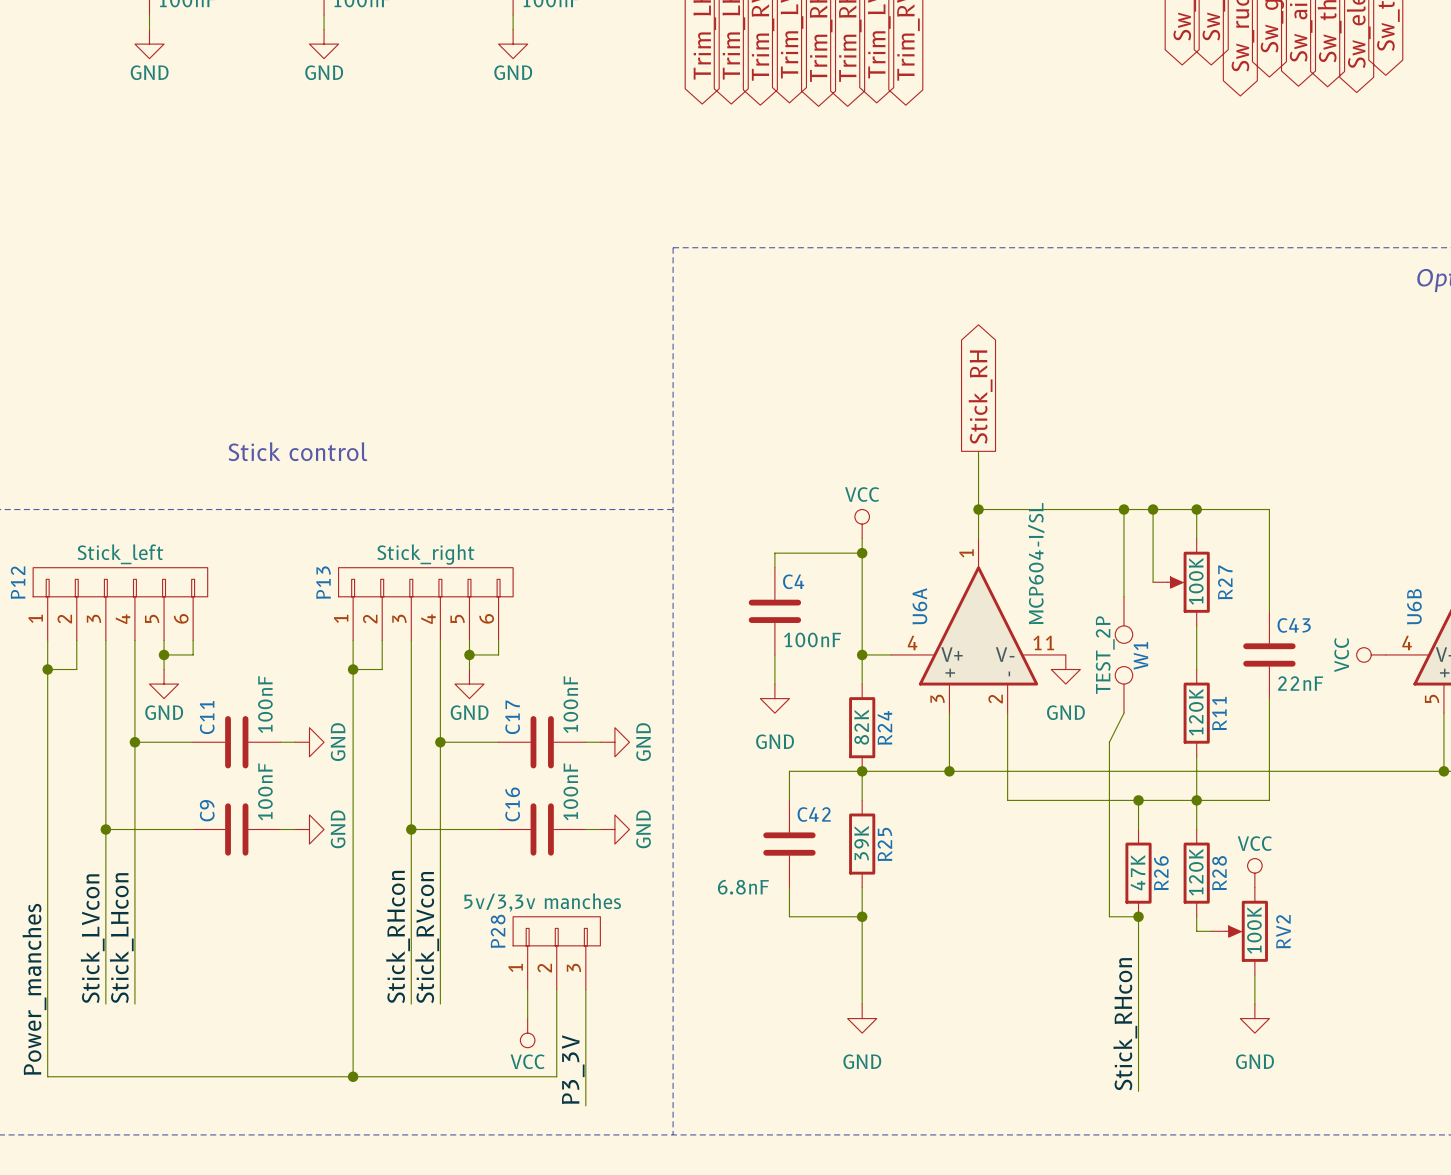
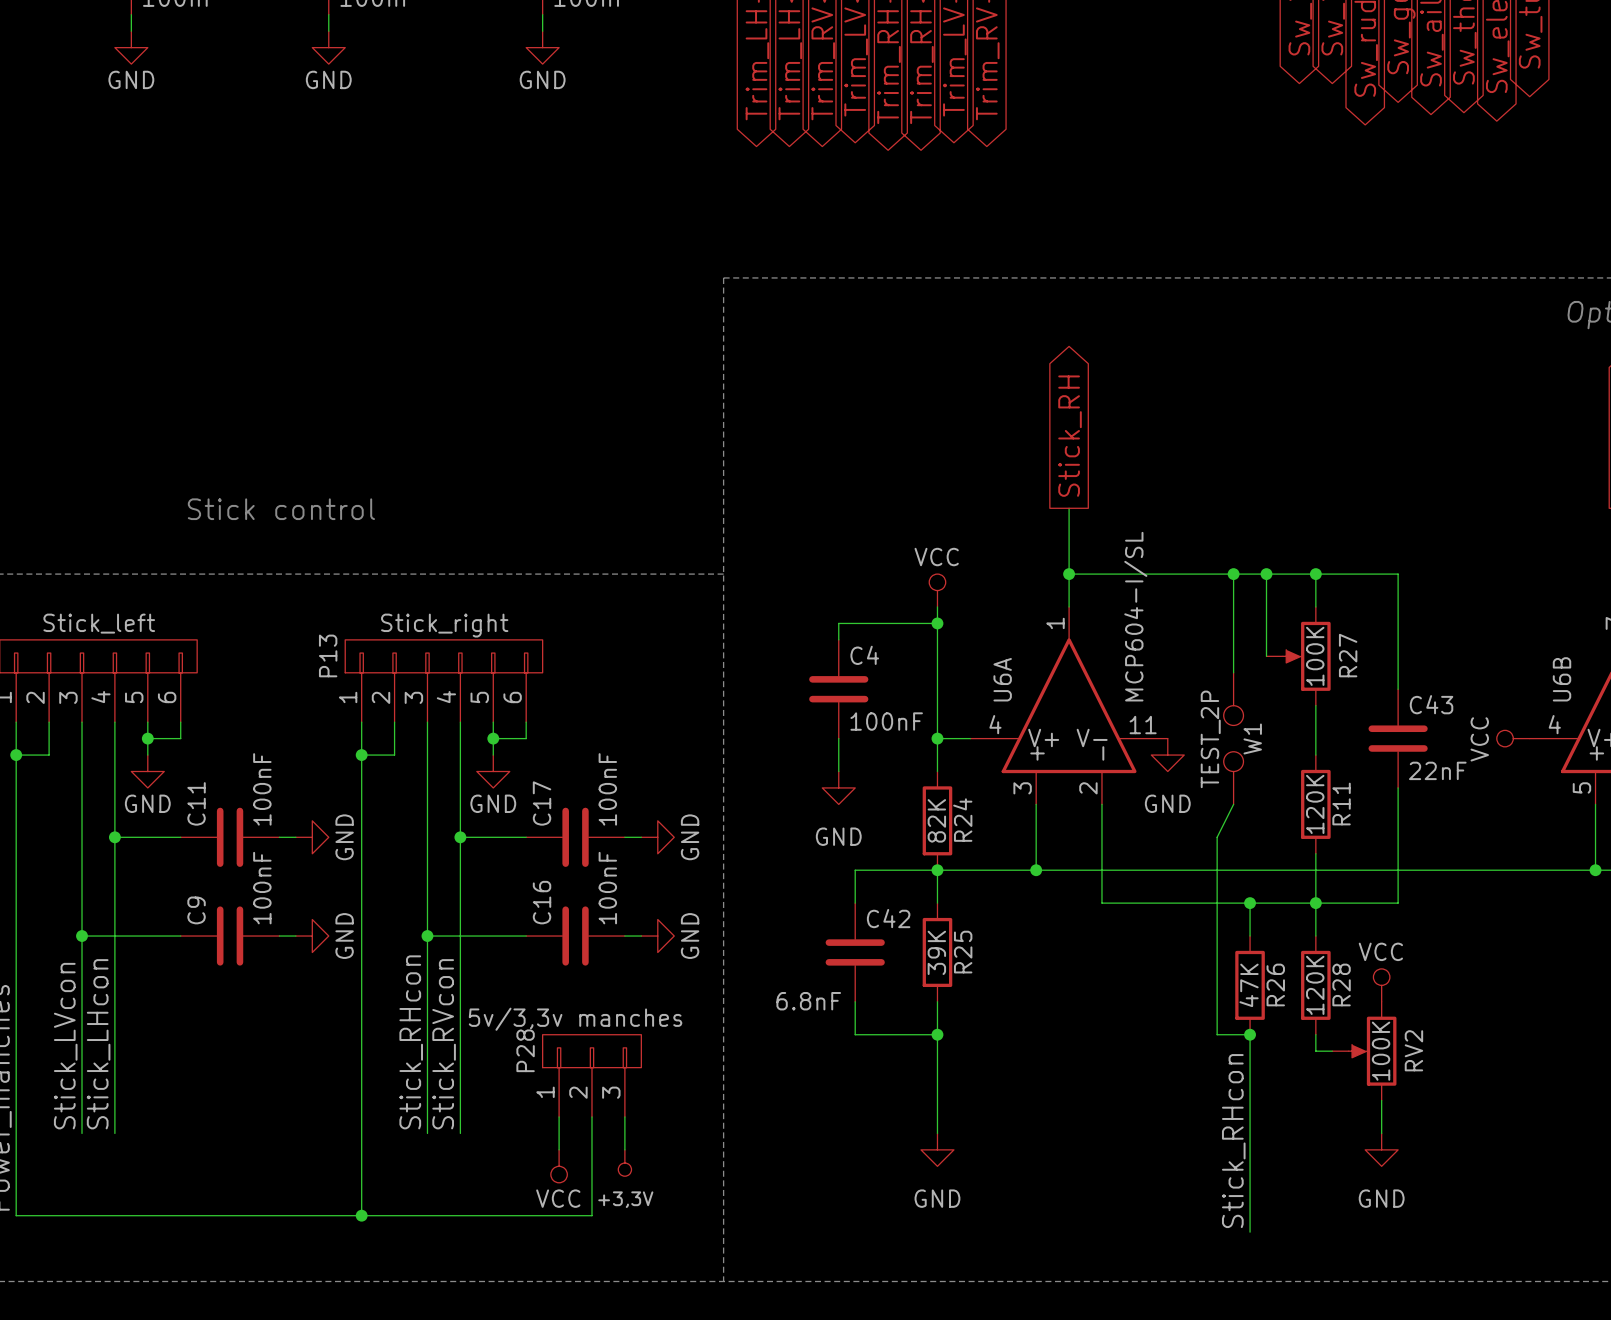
wire: (585, 1018) (585, 1105) -> none
power symbol: none -> +3,3V (624, 1163)
label: P3_3V (573, 1069) -> none

